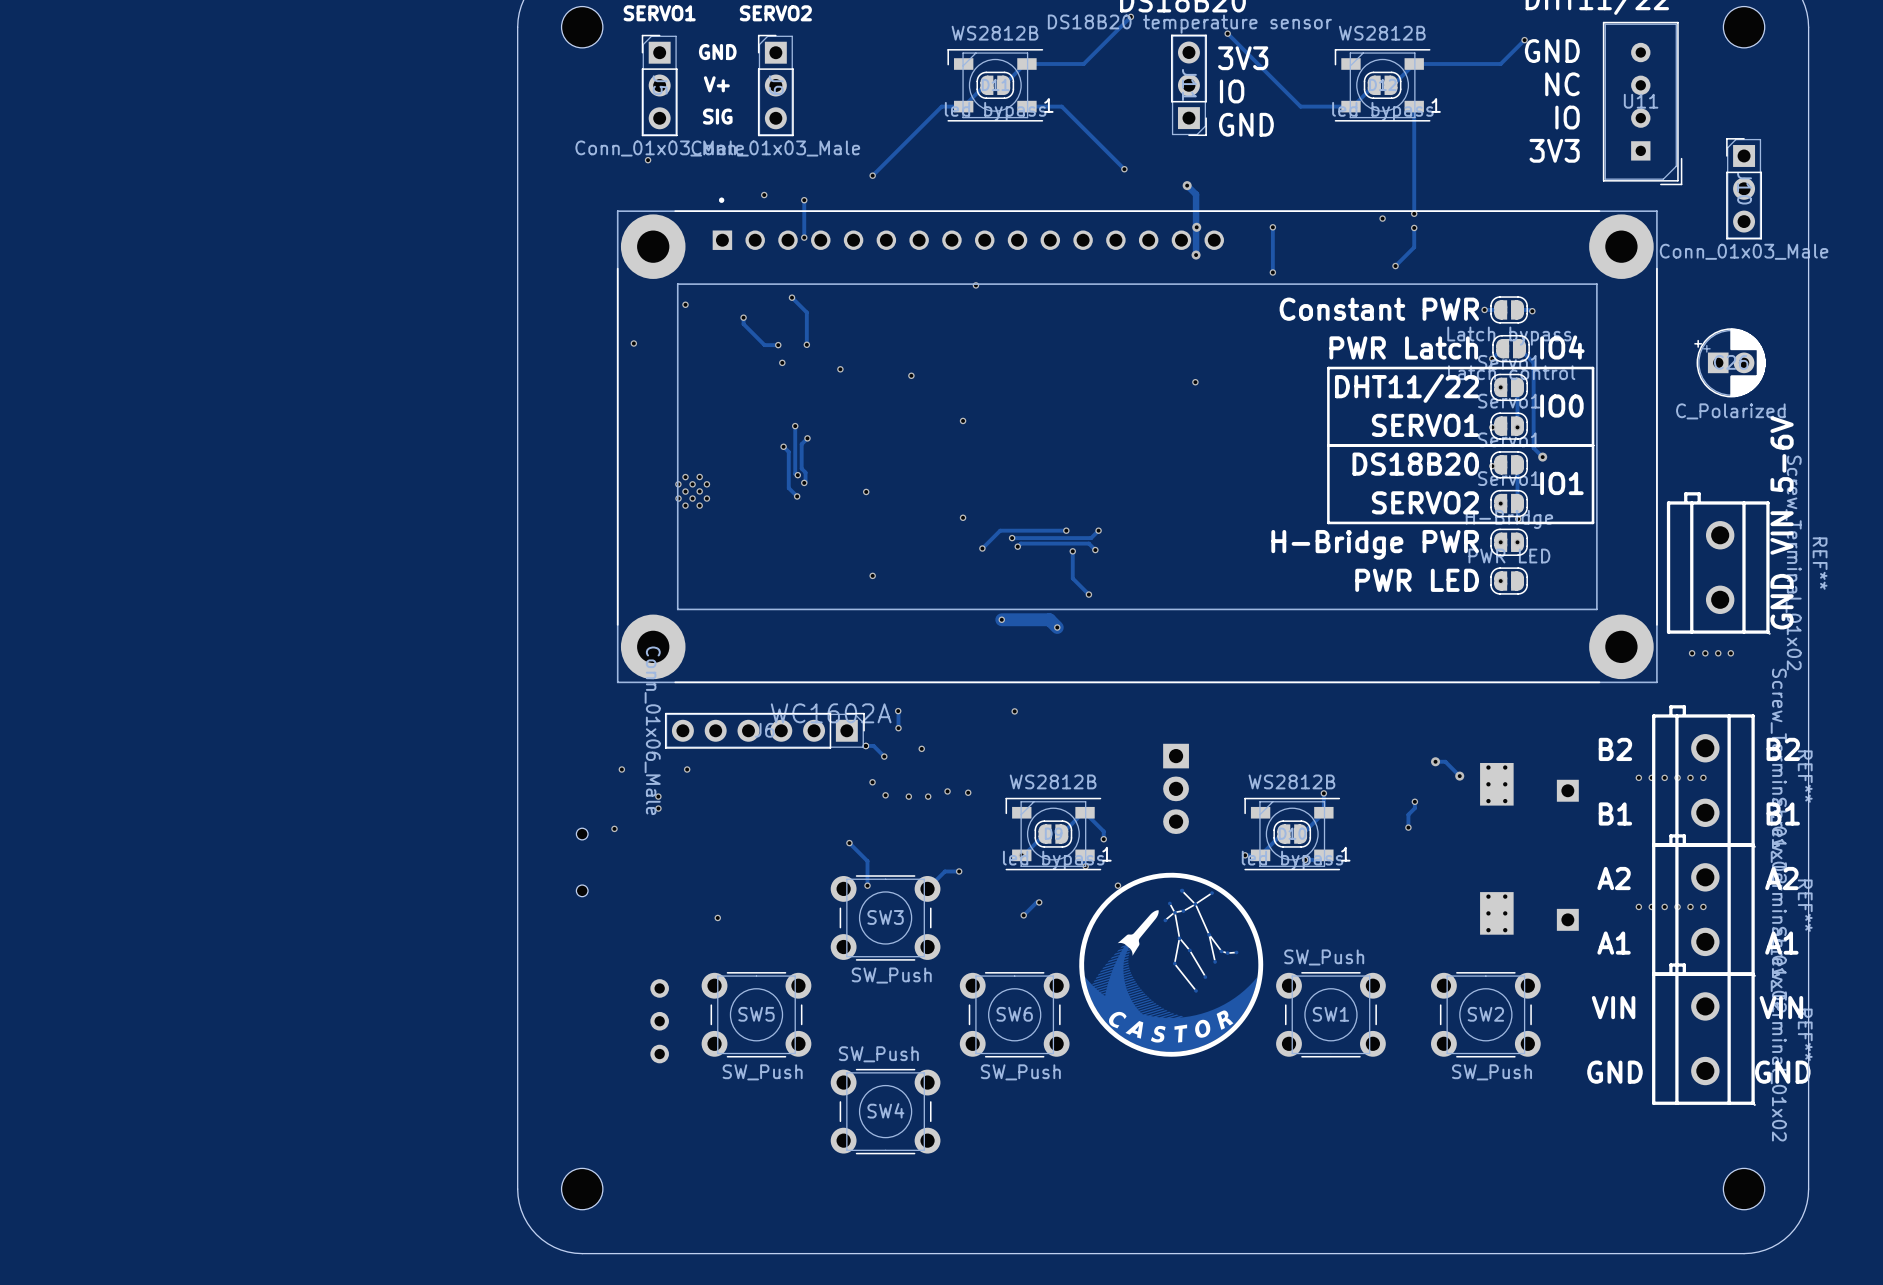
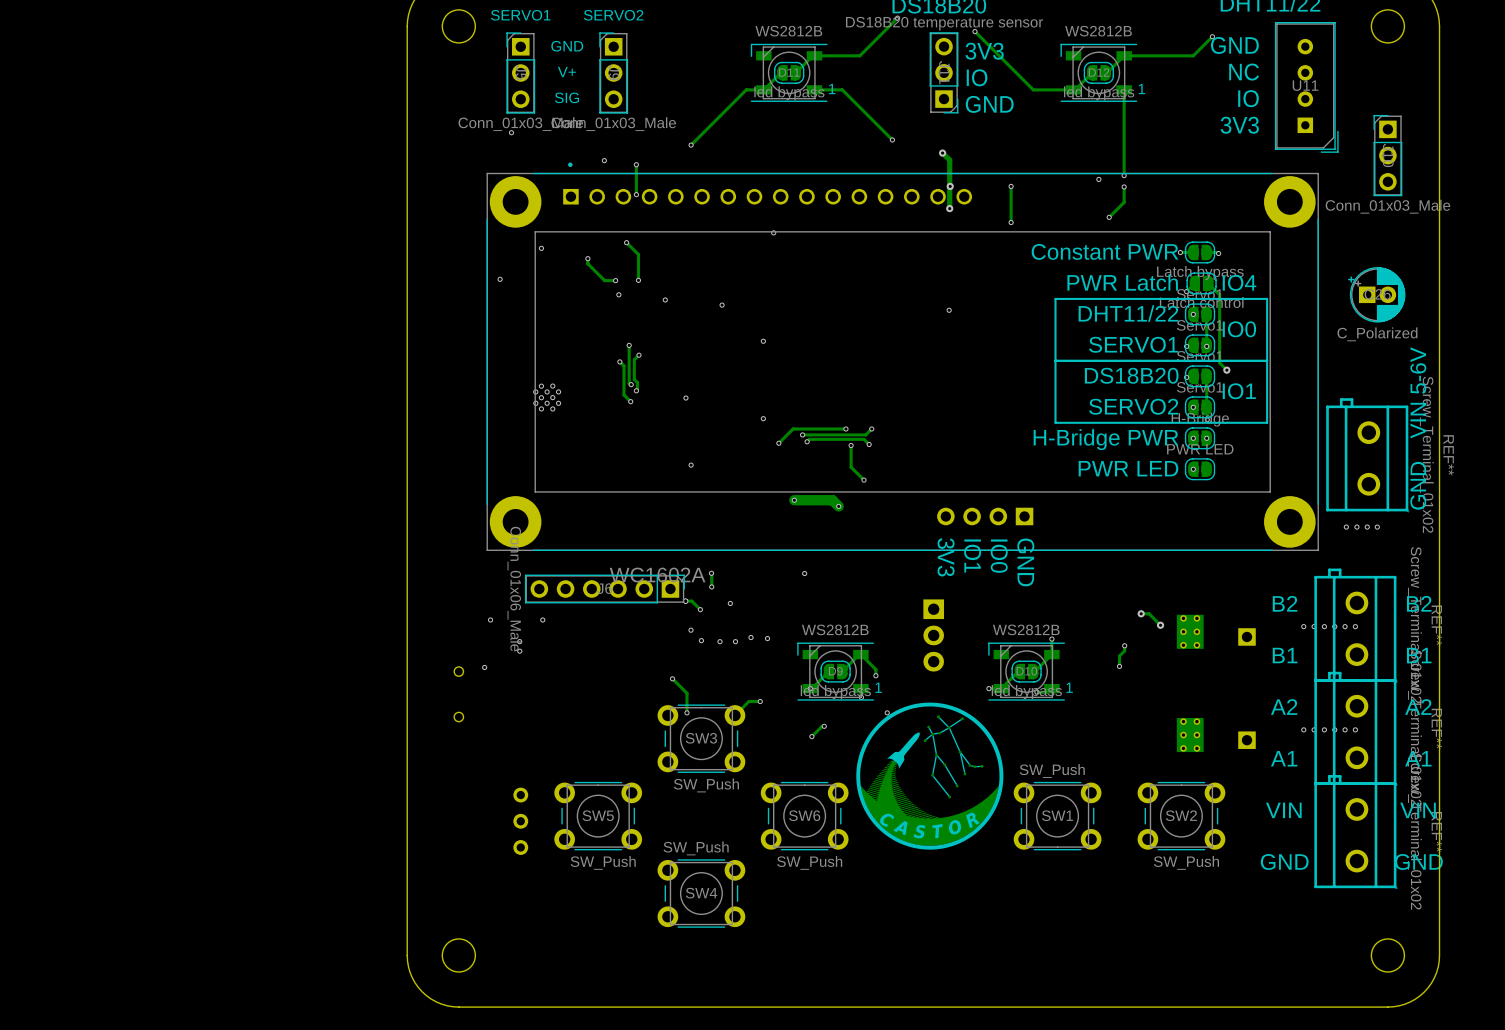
part: none -> (985, 516)
text: none -> IO1 (972, 556)
text: none -> IO0 (999, 556)
text: none -> 3V3 (946, 557)
text: none -> GND (1025, 562)
via: (717, 917) -> none

